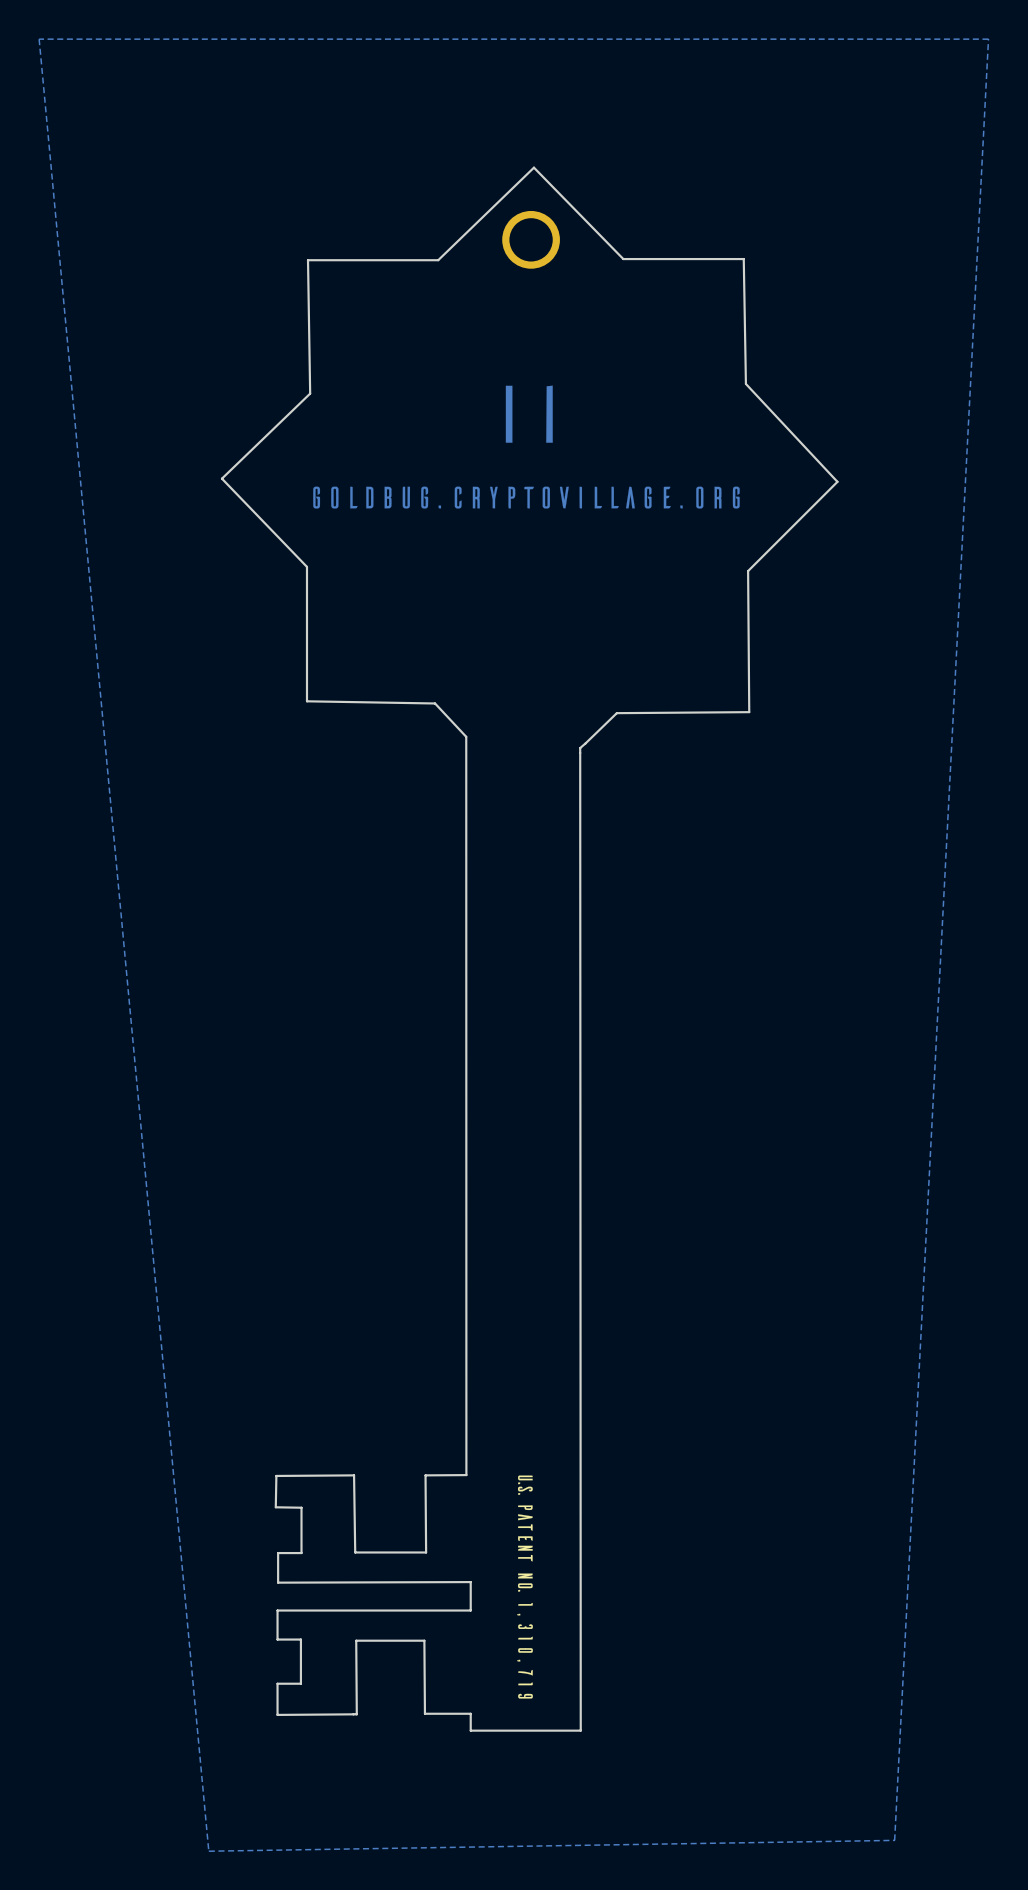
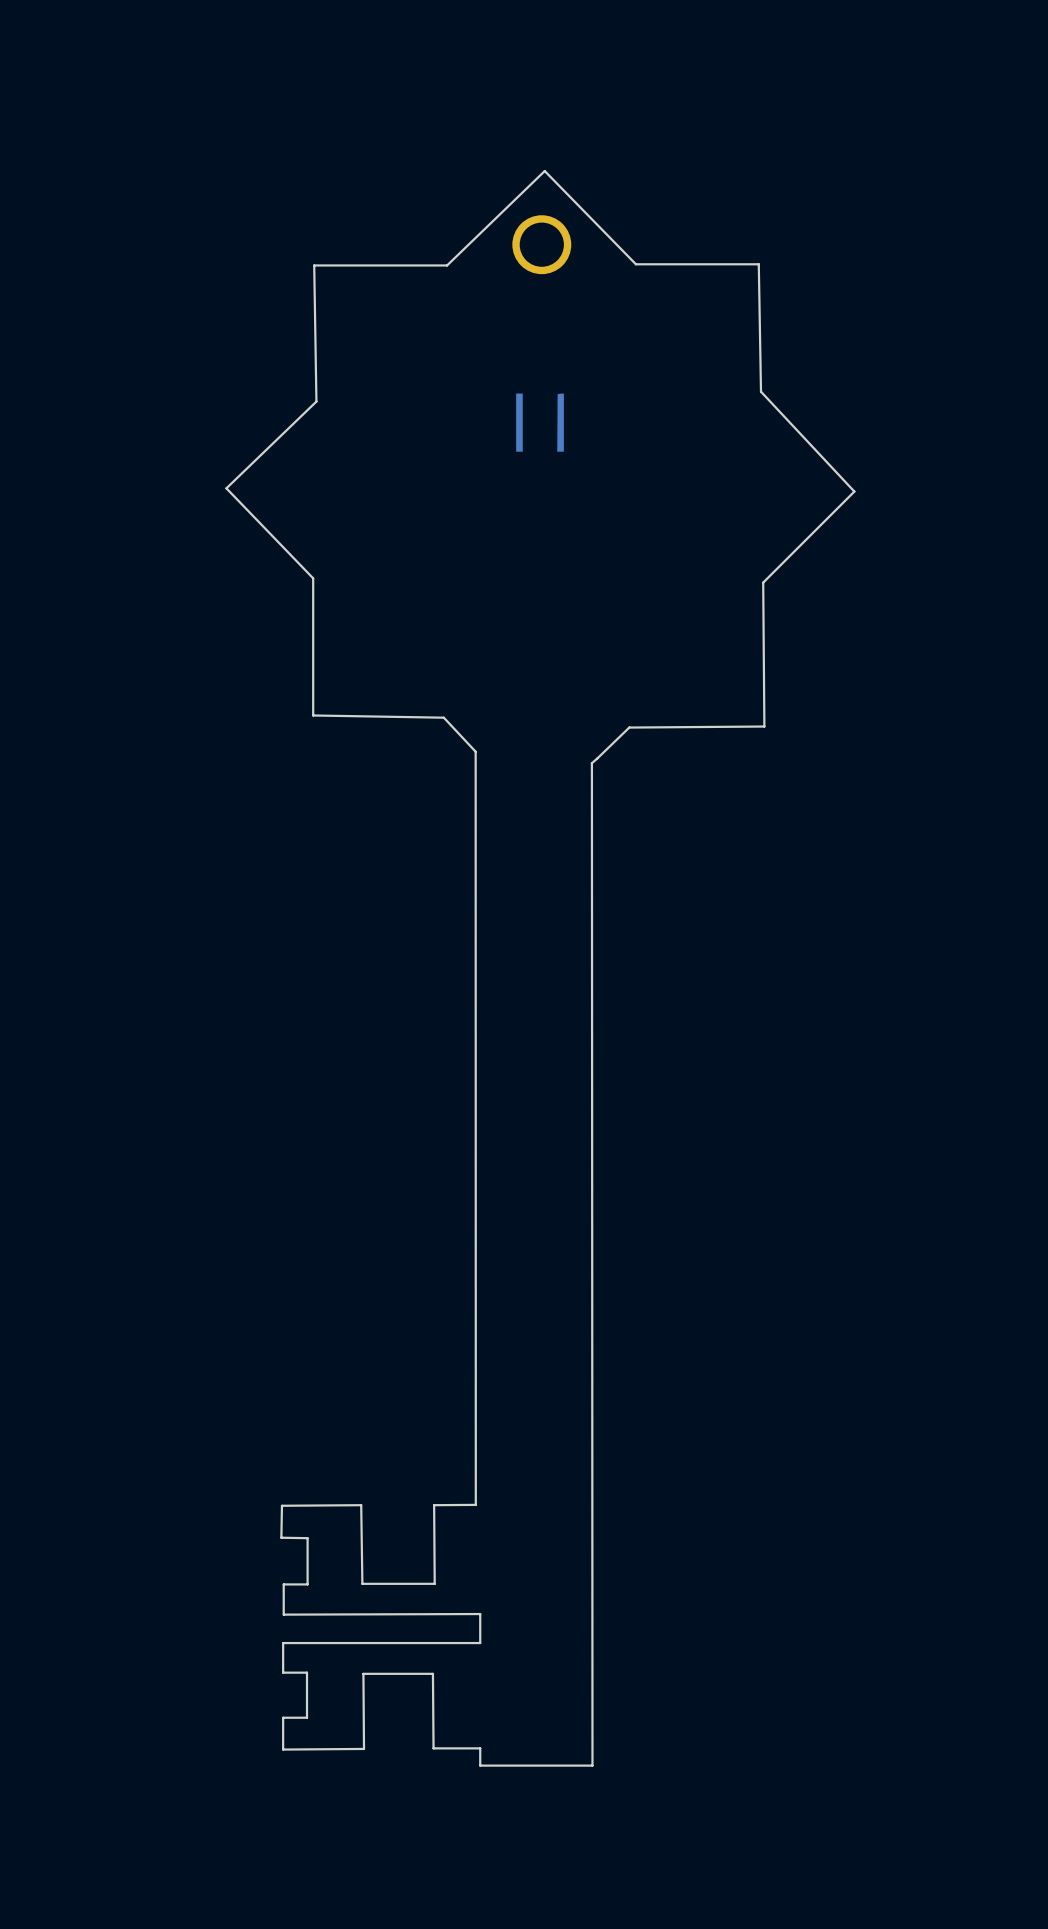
zone outline: (988, 39) (39, 39) (208, 1851) (894, 1840) (988, 39) -> none
drawing: [313, 486, 740, 509] -> none
drawing: [517, 1475, 533, 1699] -> none

